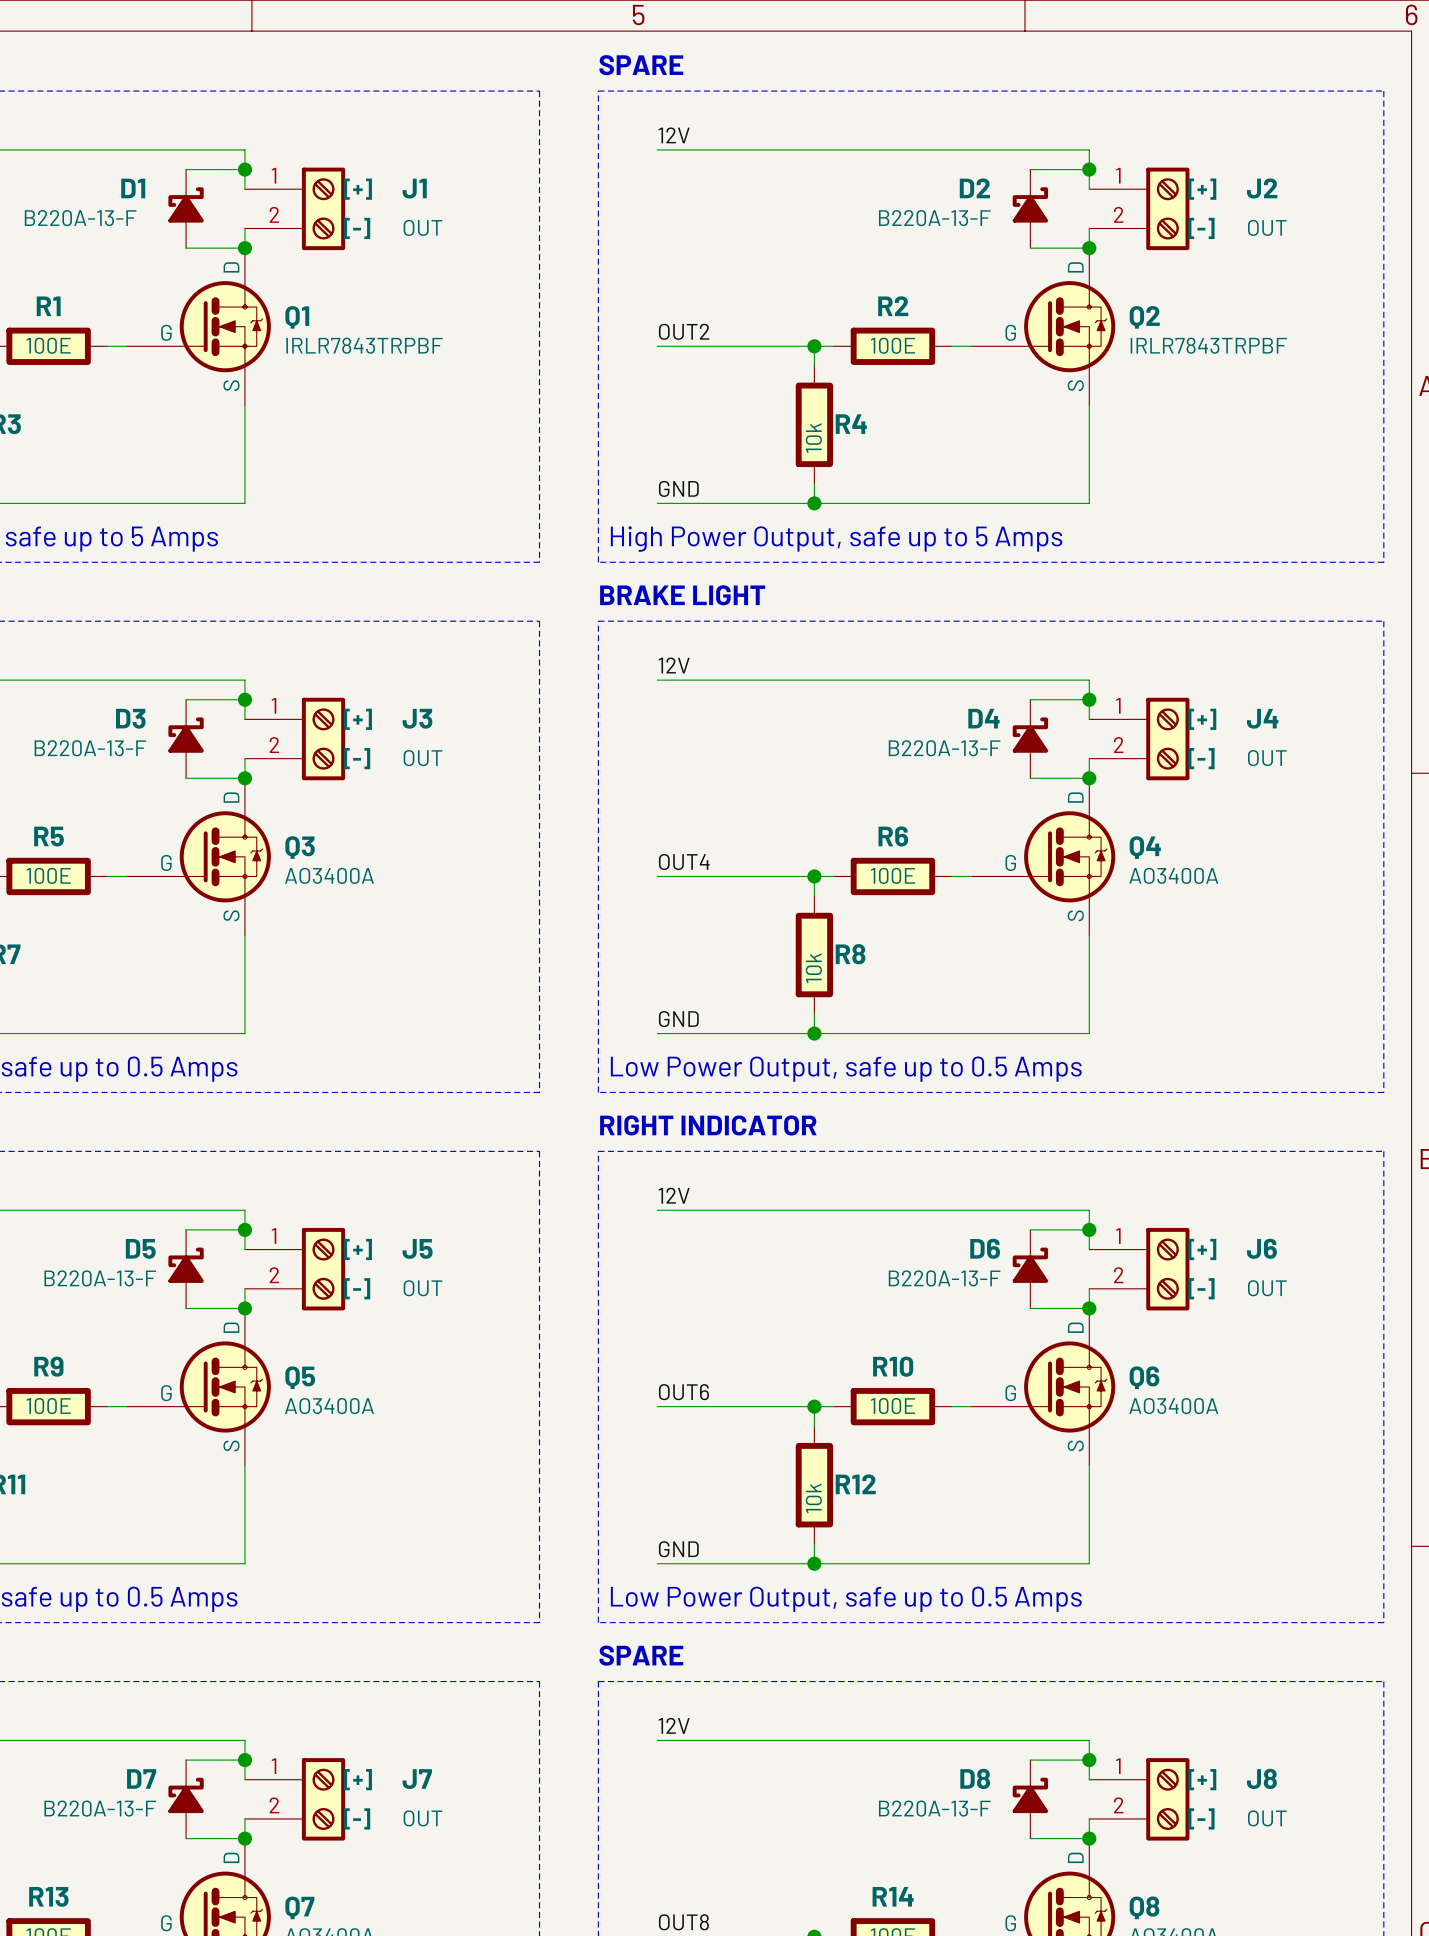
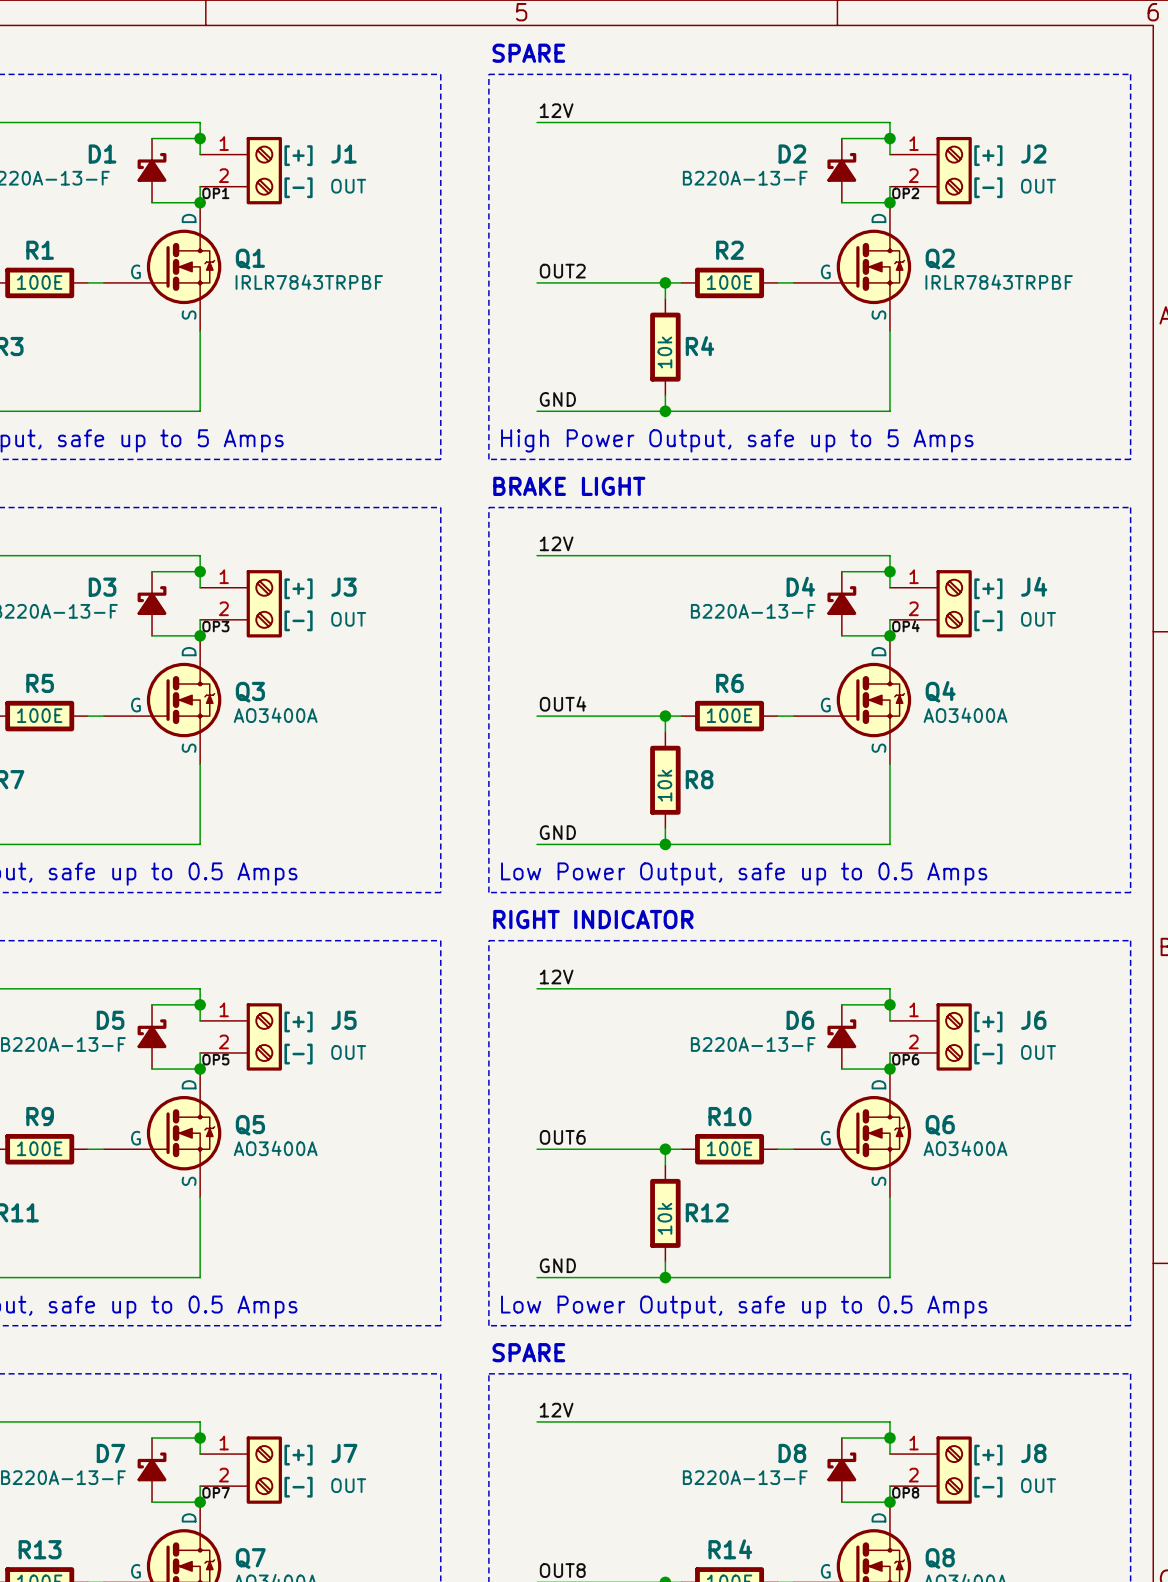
label: none -> OP1 (215, 193)
label: none -> OP2 (905, 193)
label: none -> OP3 (215, 626)
label: none -> OP4 (905, 626)
label: none -> OP5 (215, 1059)
label: none -> OP6 (905, 1059)
label: none -> OP7 (216, 1492)
label: none -> OP8 (905, 1492)

